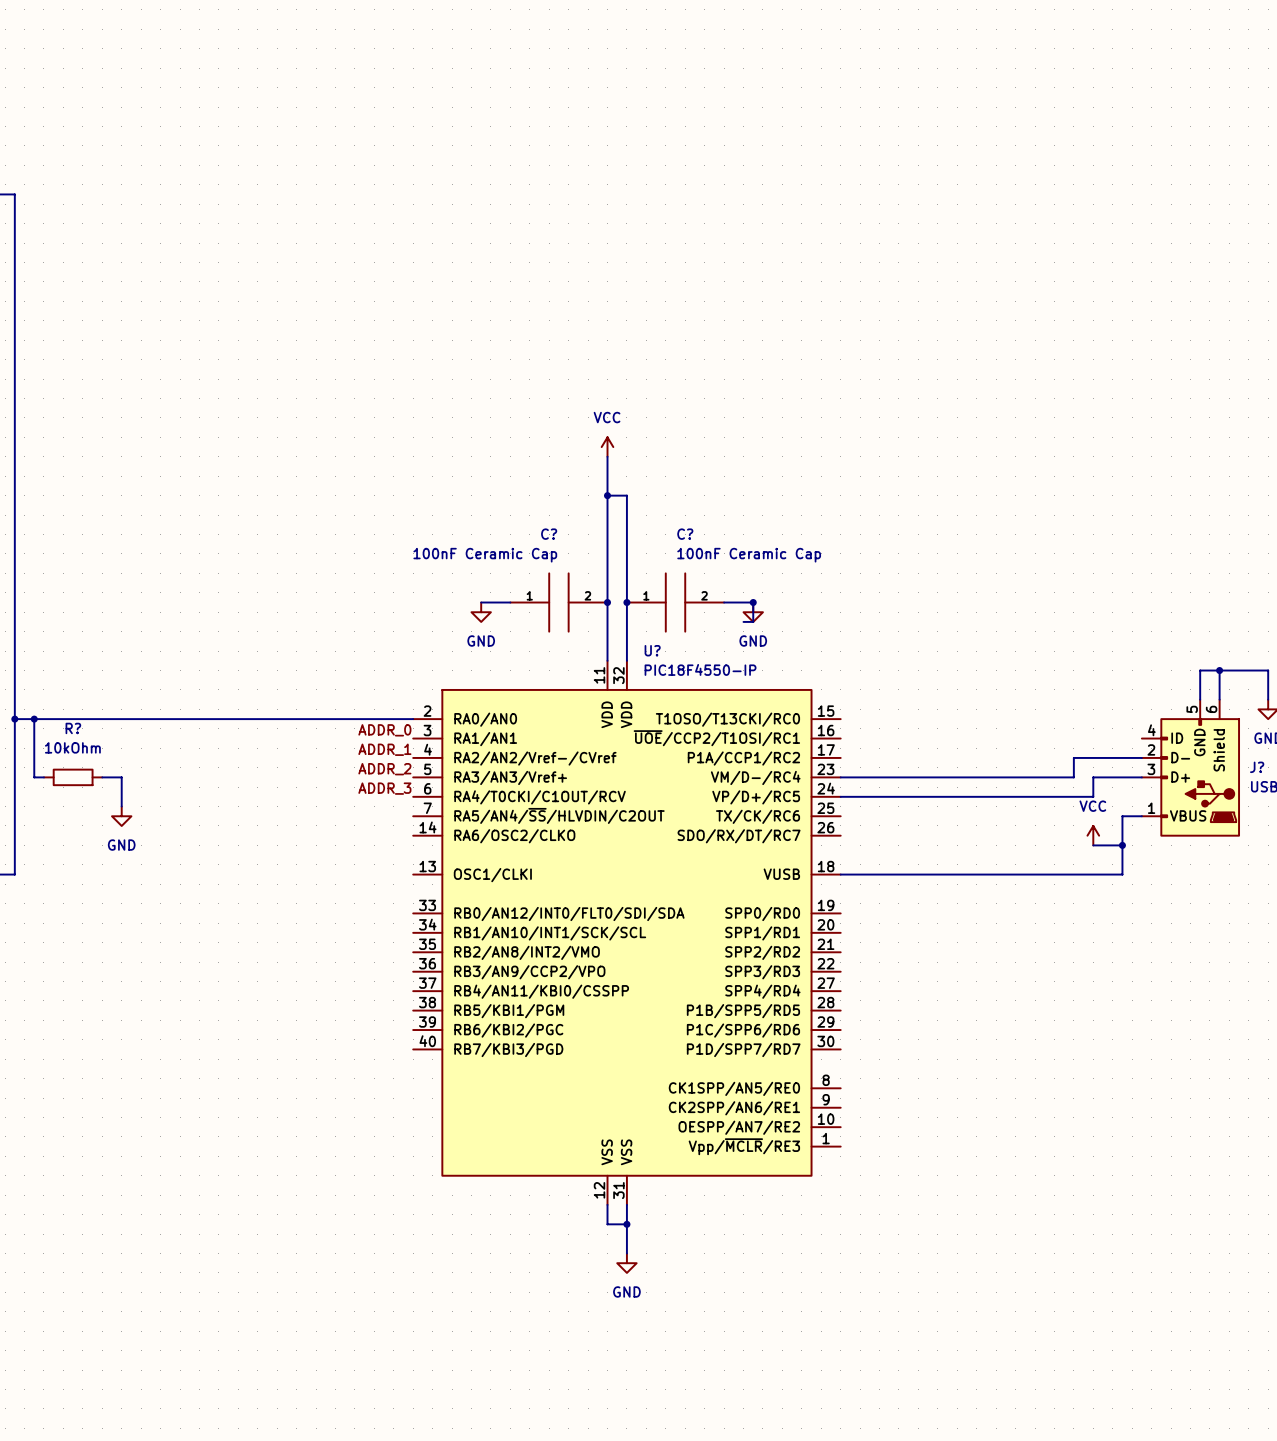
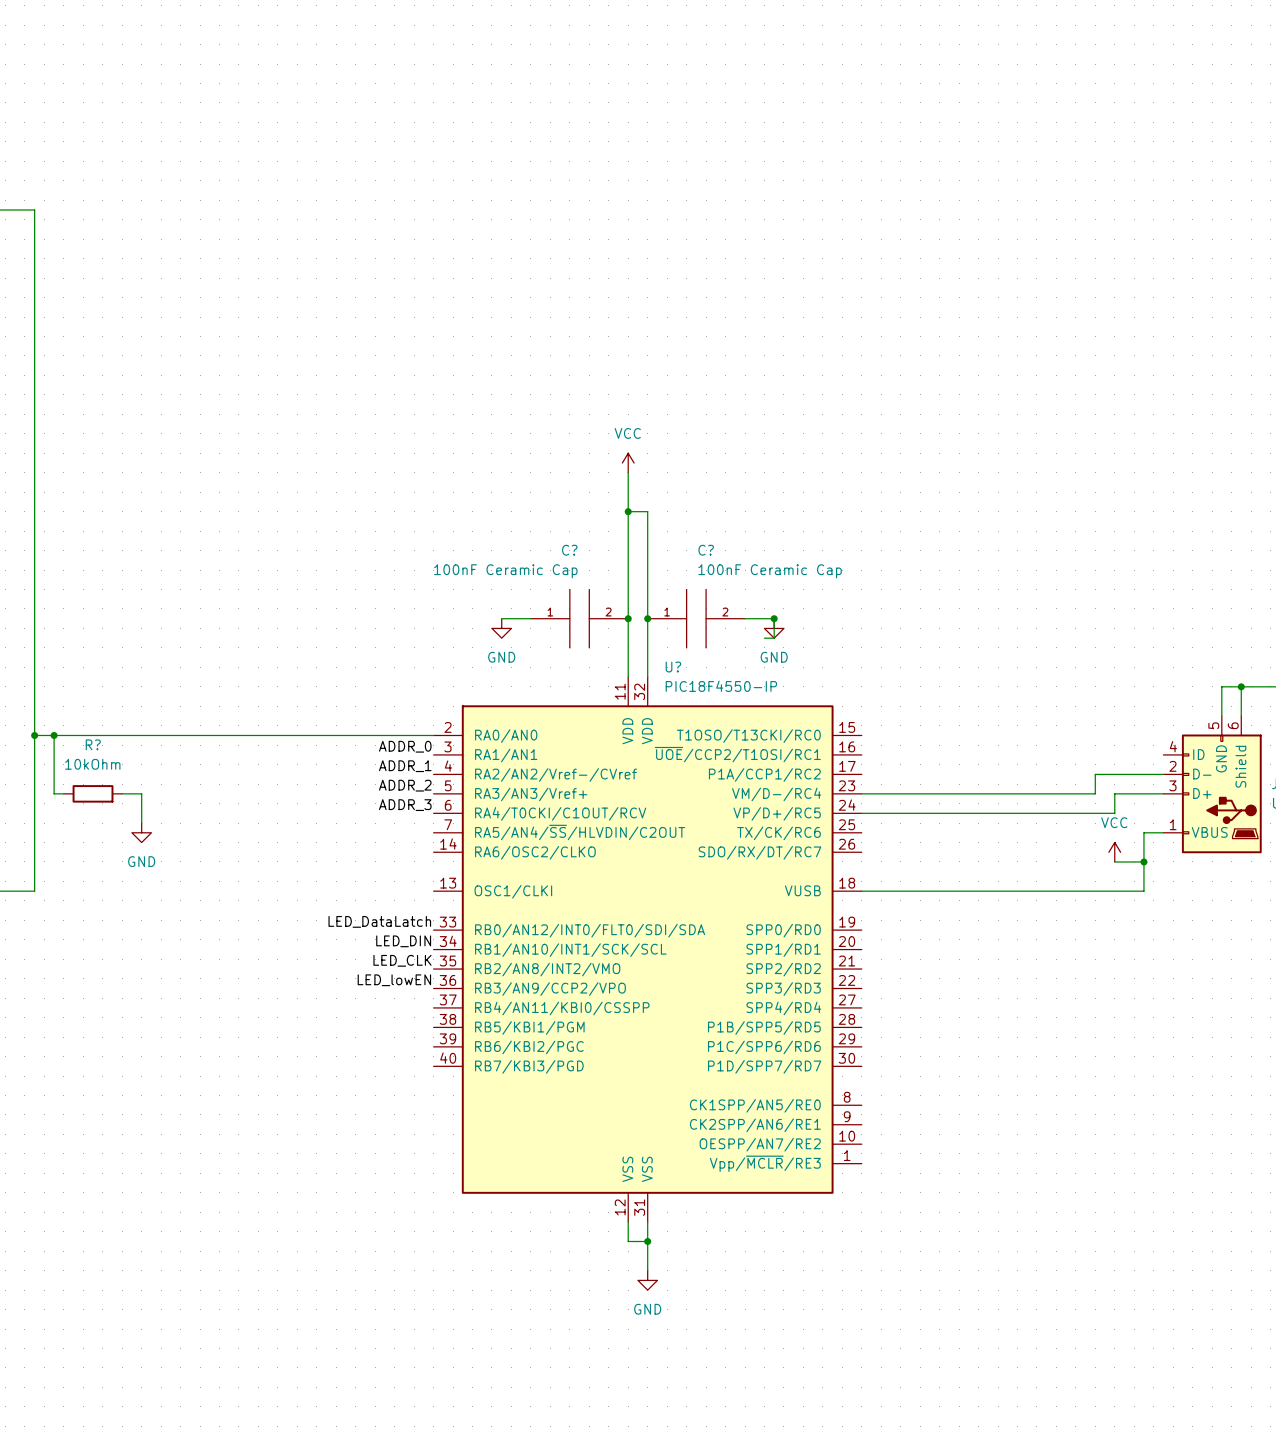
label: none -> LED_DataLatch (379, 921)
label: none -> LED_DIN (403, 941)
label: none -> LED_CLK (402, 960)
label: none -> LED_lowEN (394, 980)

